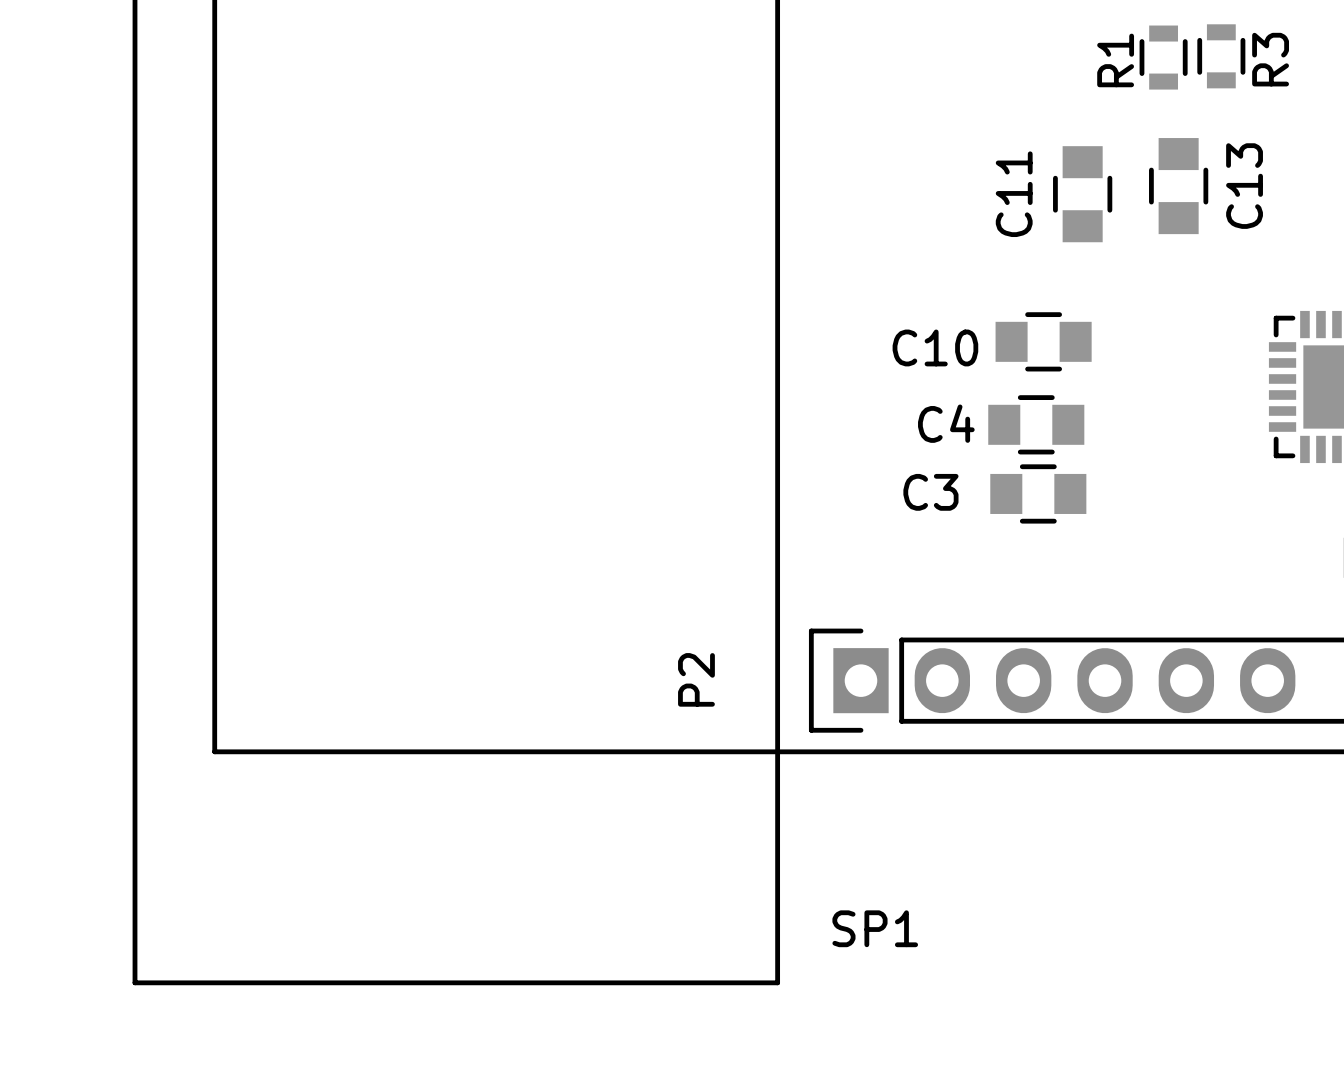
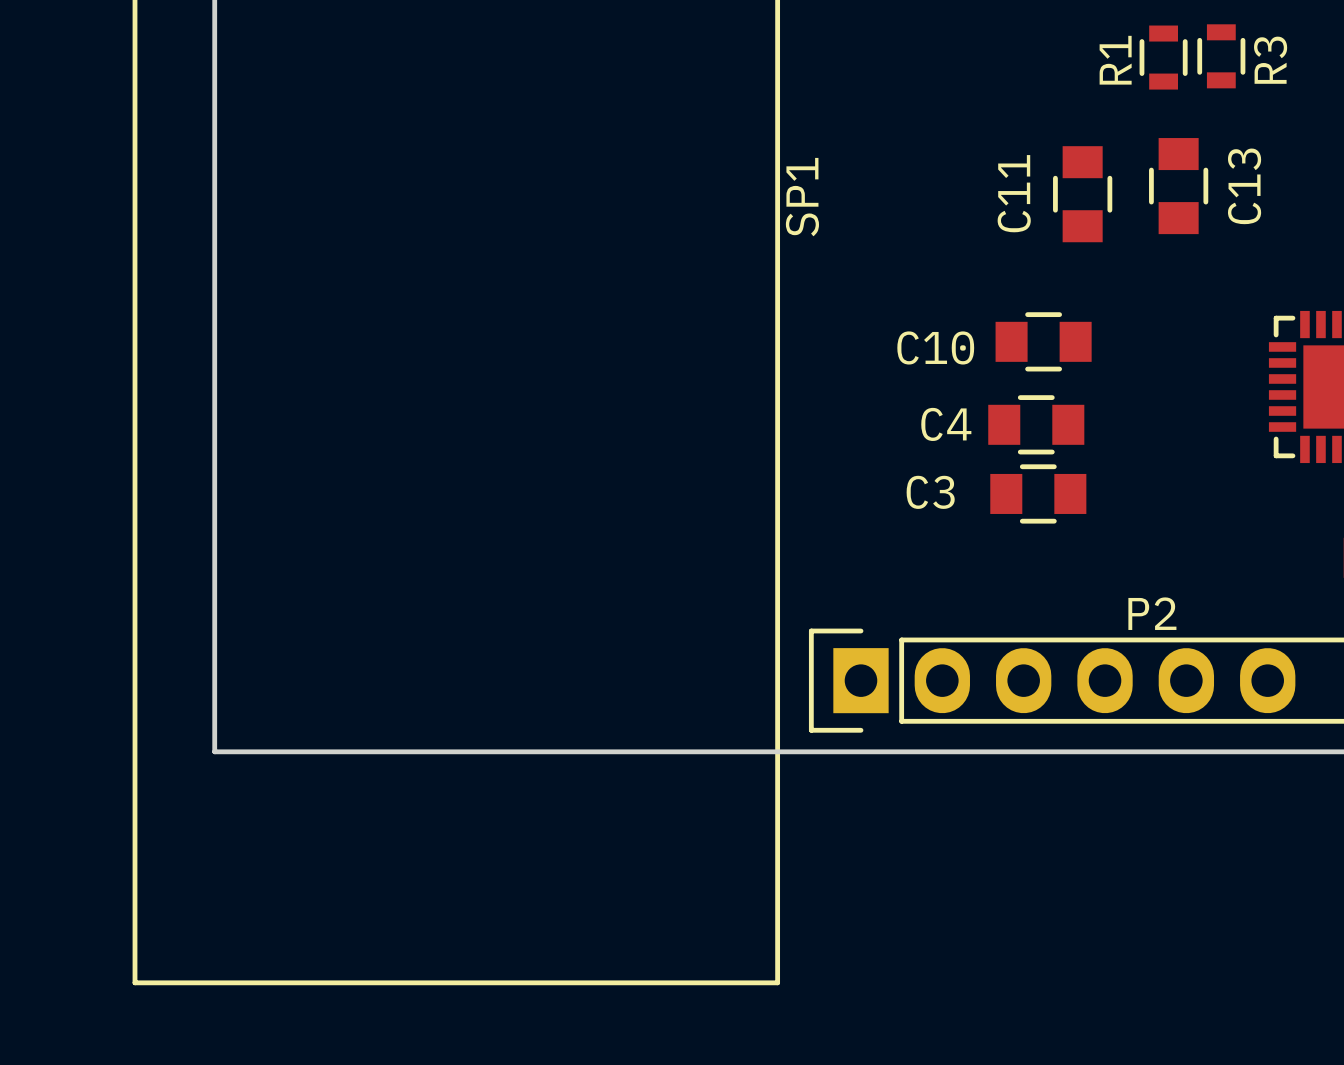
P2 name rotation: 0° (696, 679) -> 90° clockwise (1152, 613)
P2 name position: P2 (696, 679) -> P2 (1152, 613)
SP1 name rotation: 0° (875, 928) -> 90° counterclockwise (802, 197)
SP1 name position: SP1 (875, 928) -> SP1 (802, 197)

